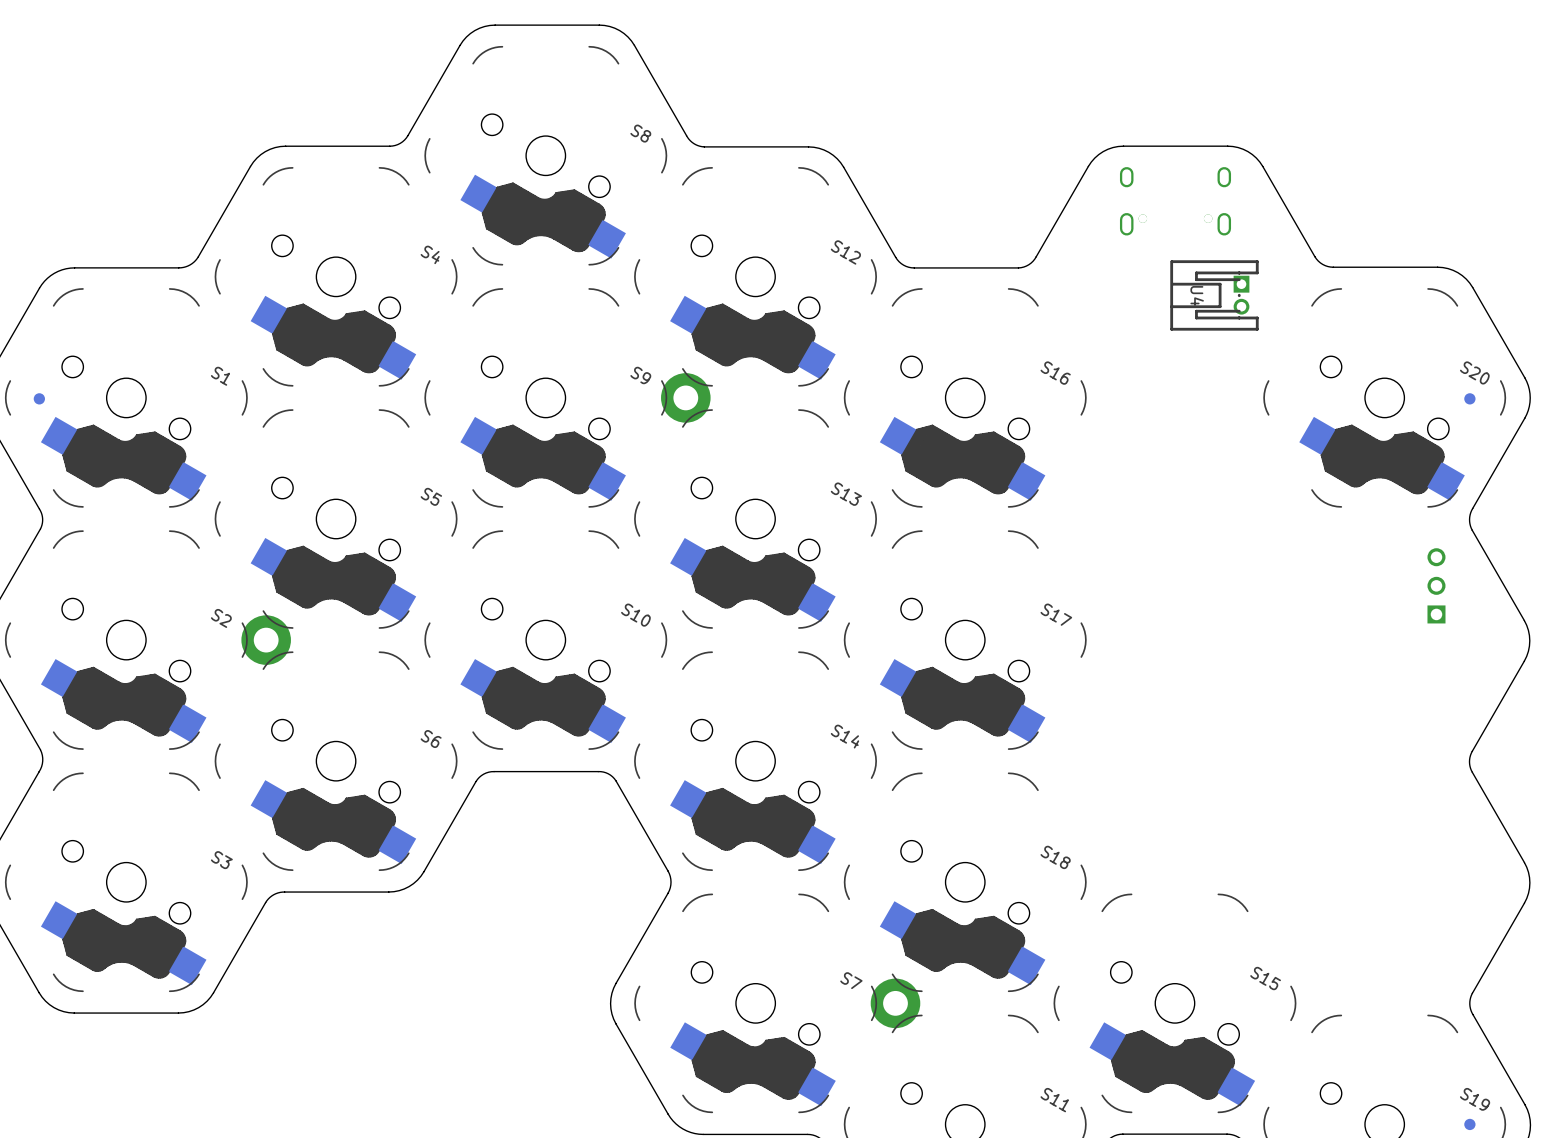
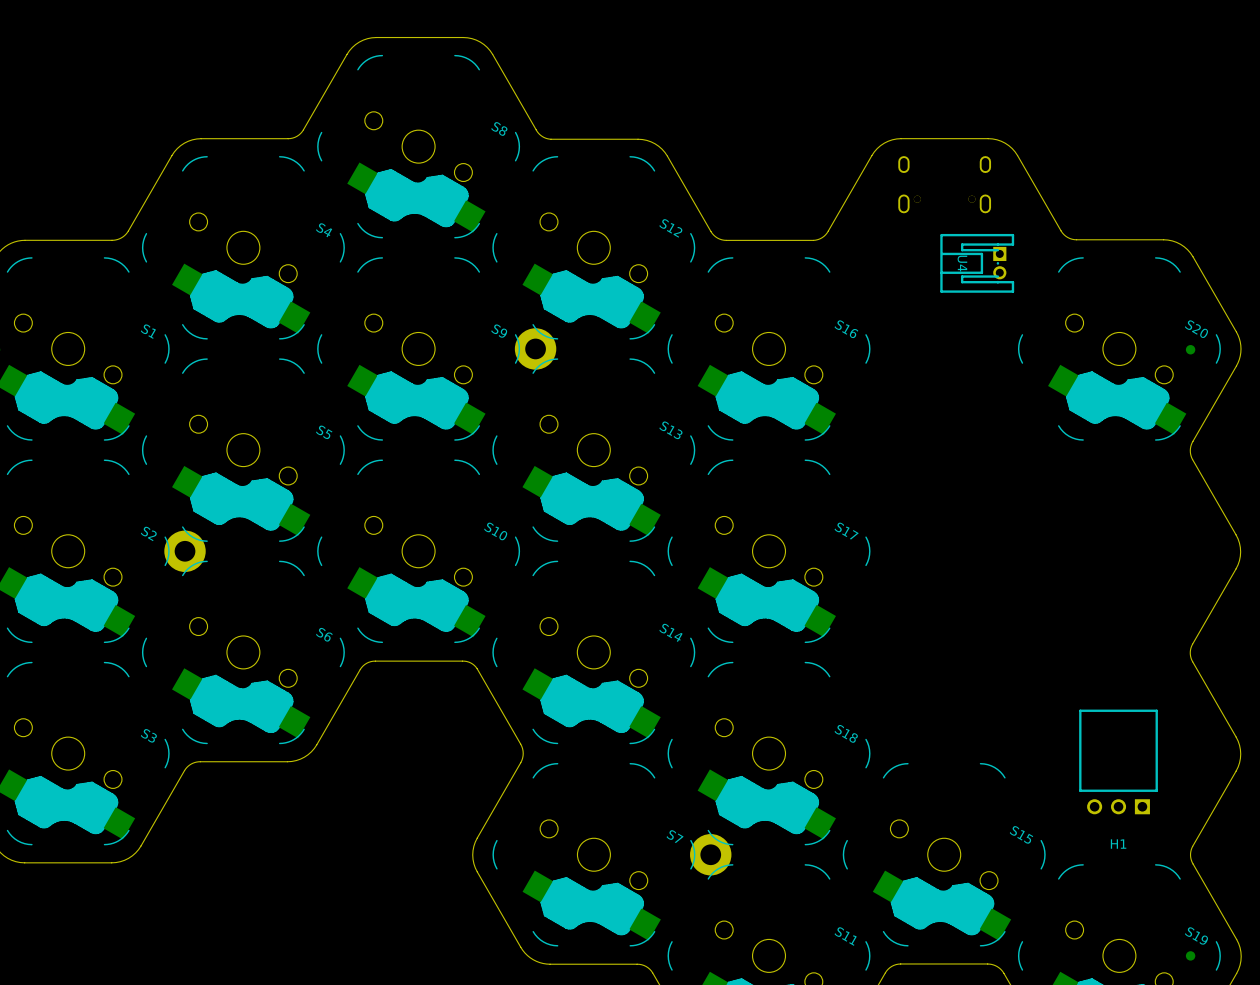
part: (1436, 585) -> none
H1: none -> (1118, 761)

